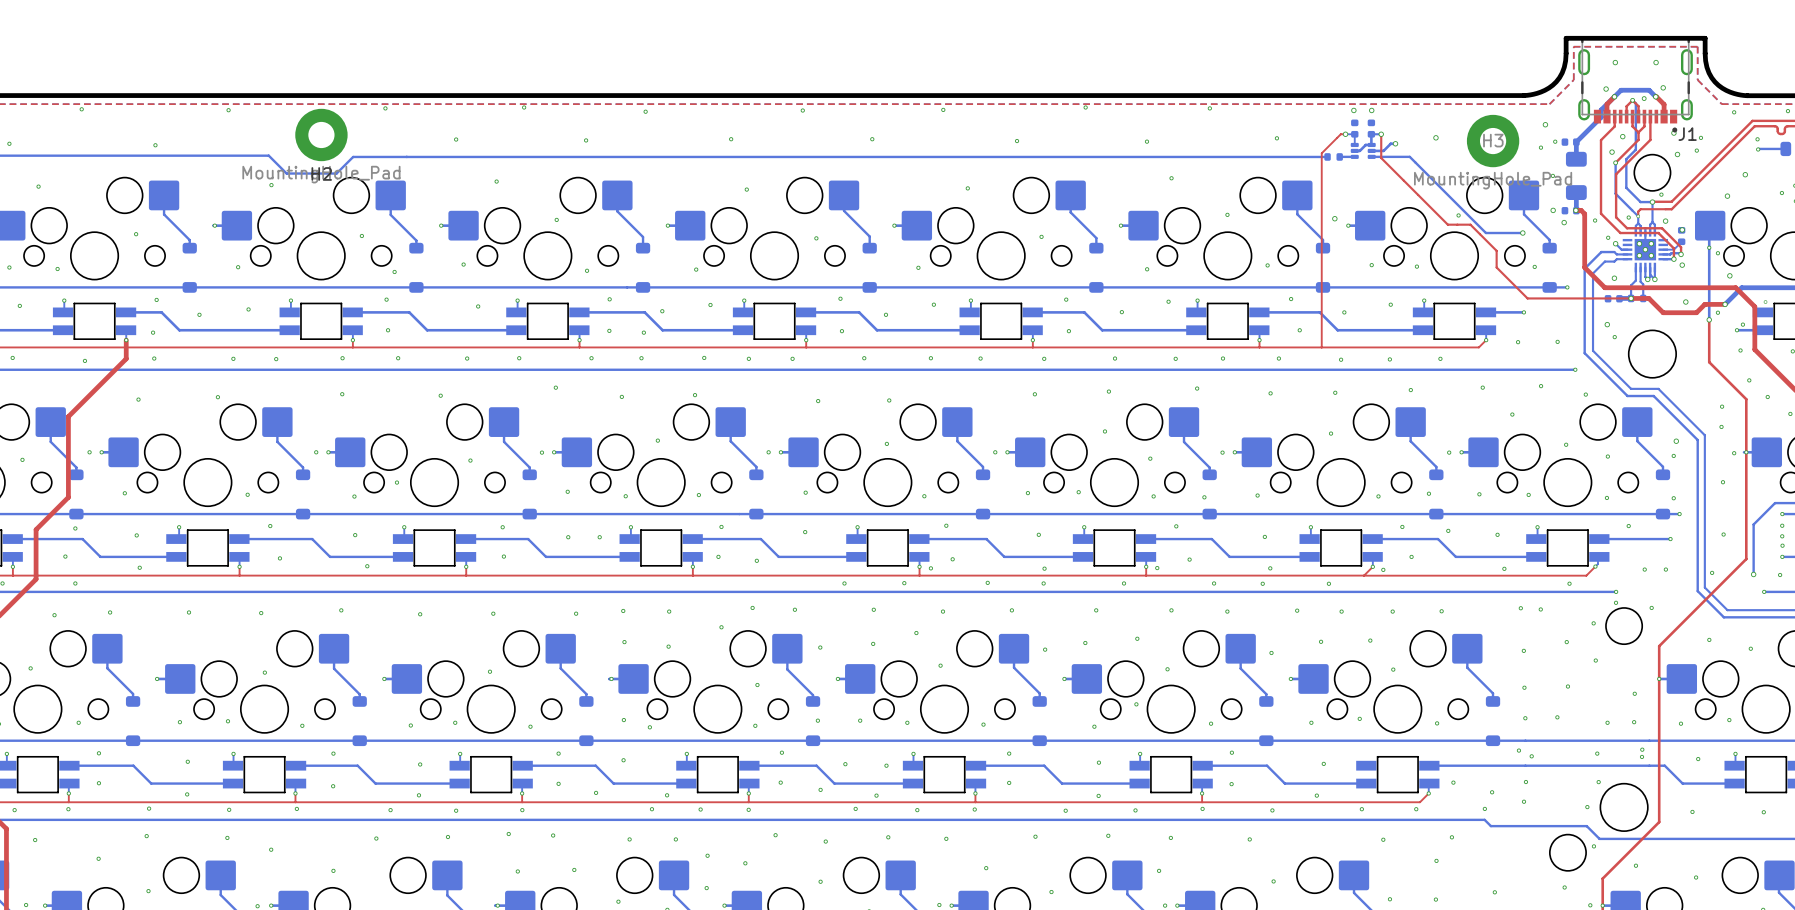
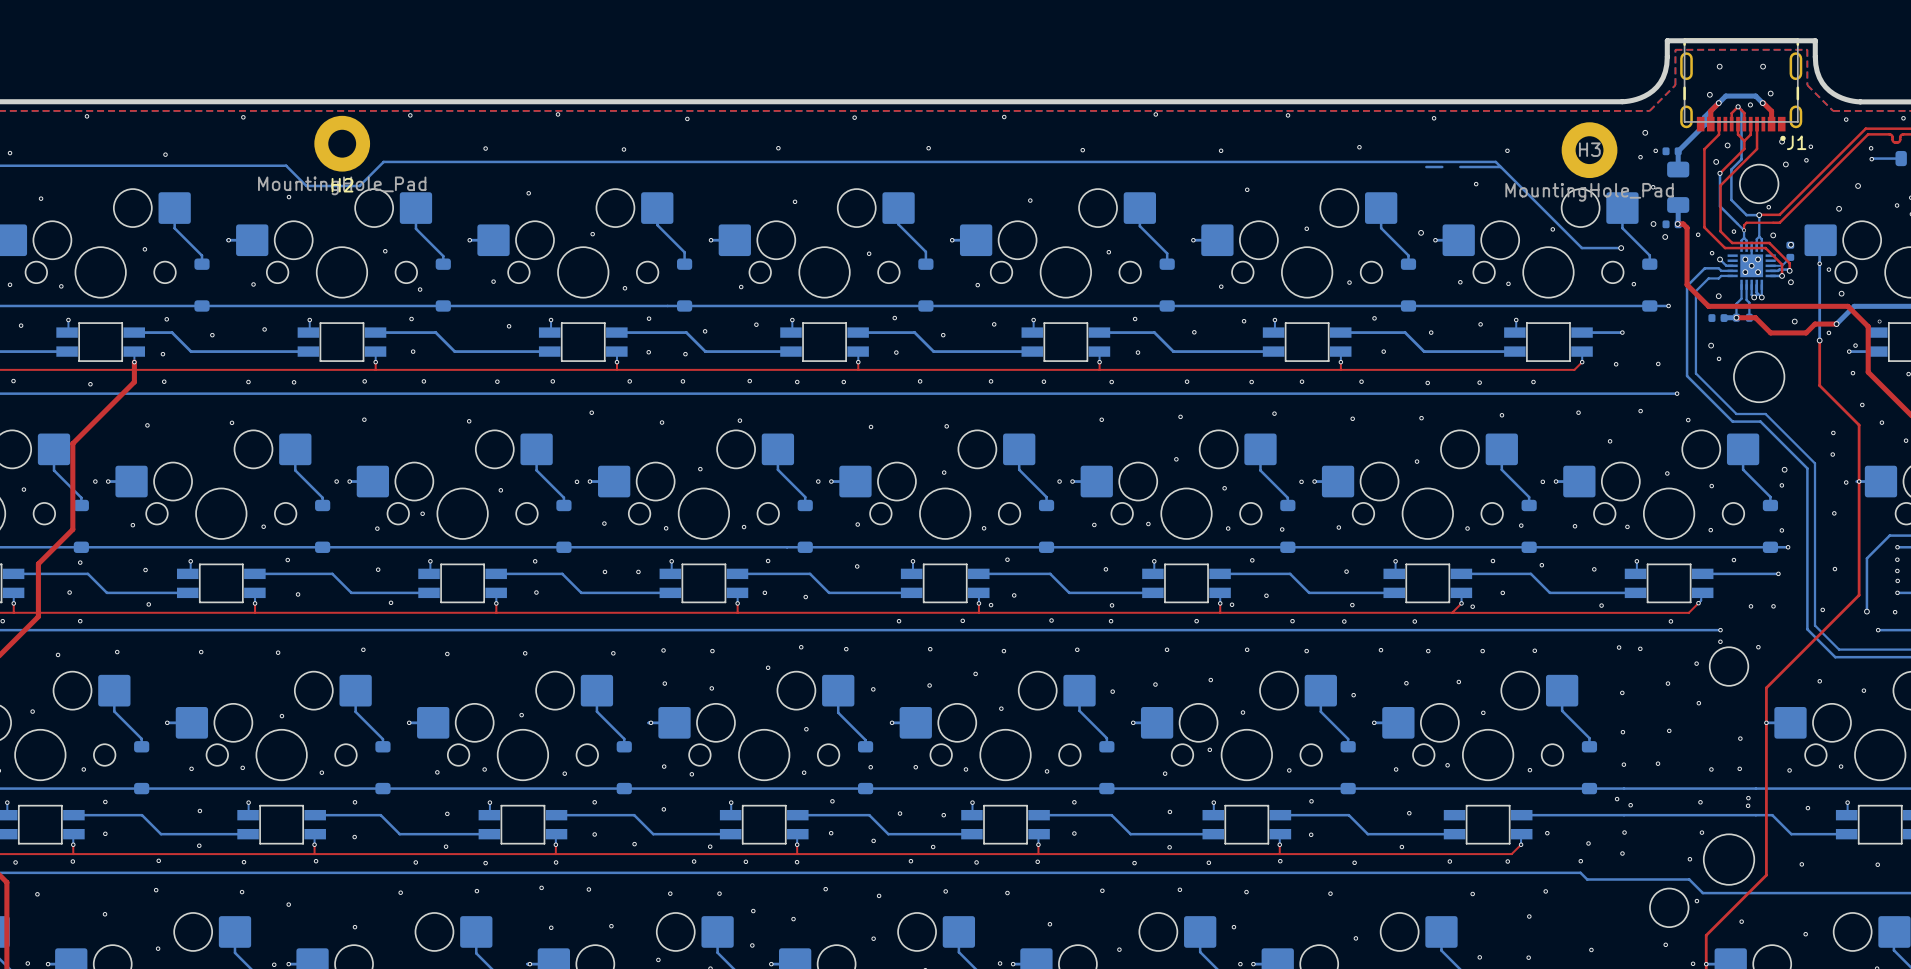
via: (1353, 110) -> none
via: (1371, 110) -> none
via: none -> (1434, 118)
part: (1354, 128) -> none
part: (1371, 128) -> none
bottom track: (1345, 134) (1354, 134) (1354, 144) -> none
top track: (1345, 134) (1340, 134) (1321, 153) (1321, 347) -> none
via: (1345, 134) -> none
bottom track: (1381, 134) (1371, 134) (1371, 144) (1365, 144) (1359, 150) (1354, 150) -> none
top track: (1381, 134) (1381, 158) (1447, 224) (1470, 224) (1496, 250) (1496, 267) (1527, 298) (1631, 298) -> none
via: (1381, 134) -> none
via: (1435, 137) -> none
via: none -> (1507, 150)
bottom track: (1395, 143) (1390, 143) (1383, 150) (1371, 150) -> none
via: (1395, 143) -> none
part: (1363, 150) -> none
bottom track: (1327, 156) (353, 156) (336, 173) (286, 173) -> (1500, 167) (1495, 161) (383, 161) (359, 186) (305, 184)
part: (1333, 156) -> none
via: none -> (1476, 184)

